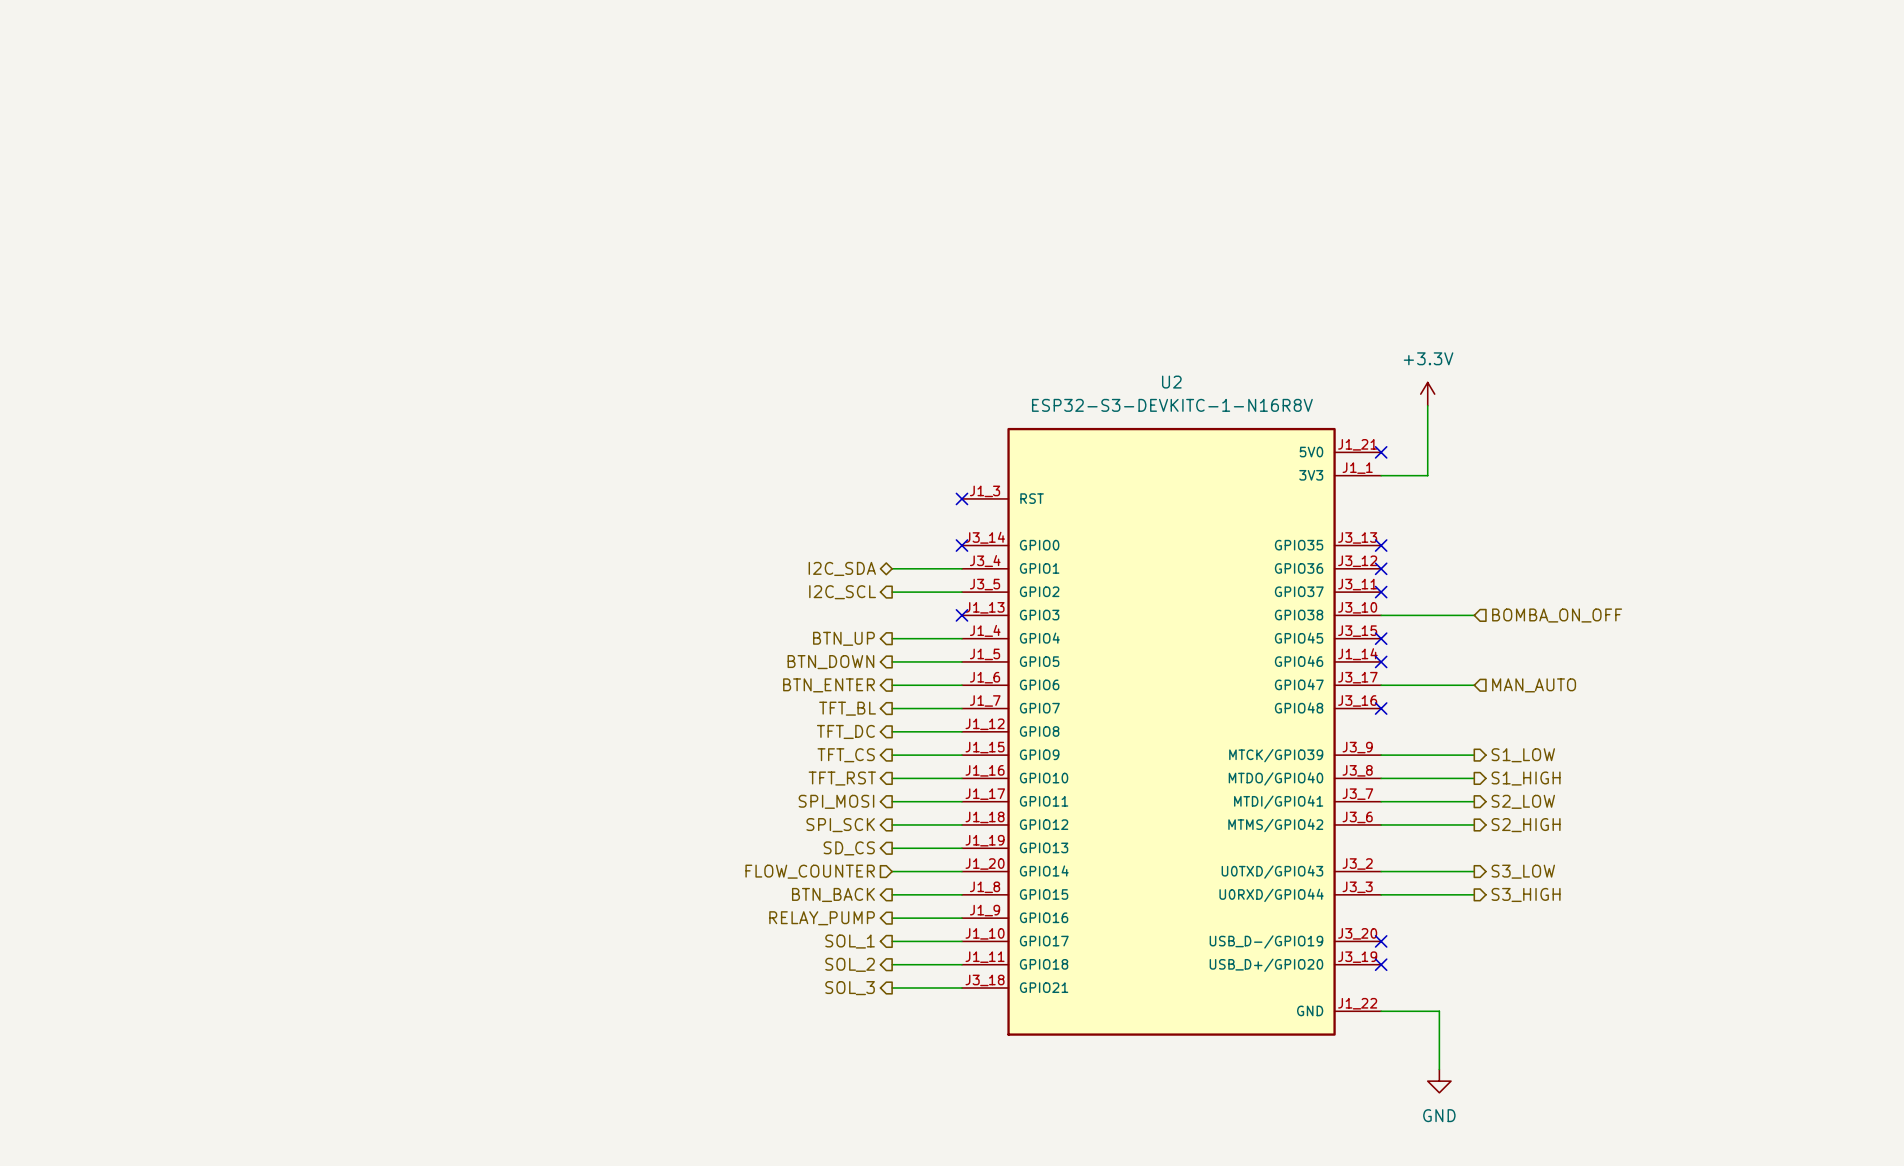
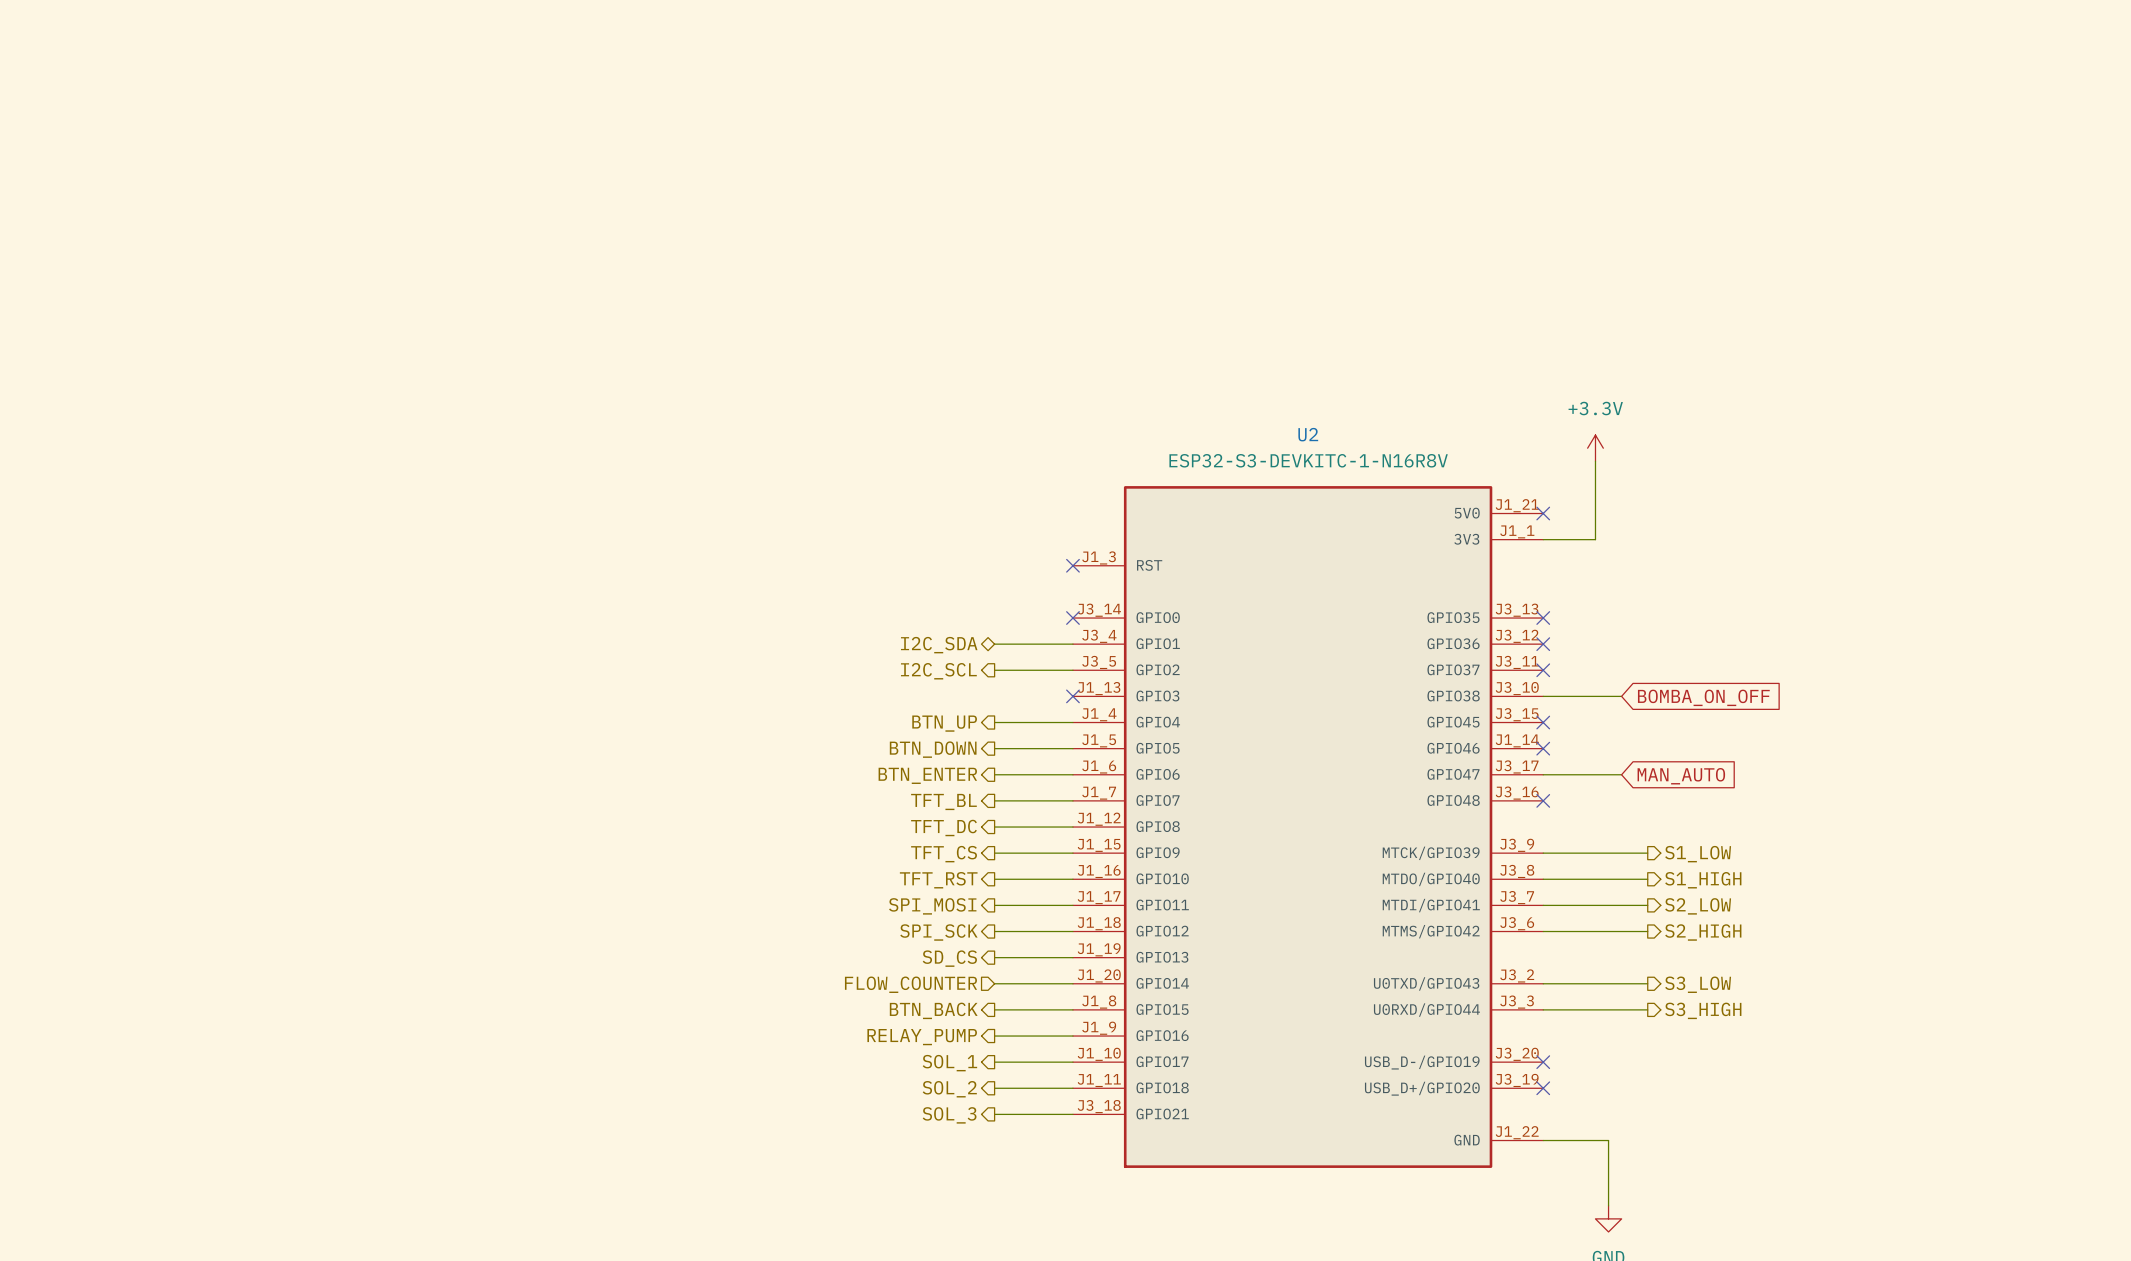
wire: (1451, 615) (1474, 615) -> none
global label: none -> BOMBA_ON_OFF (1703, 697)
hierarchical label: BOMBA_ON_OFF (1557, 615) -> none
wire: (1451, 685) (1474, 685) -> none
global label: none -> MAN_AUTO (1681, 776)
hierarchical label: MAN_AUTO (1534, 685) -> none

